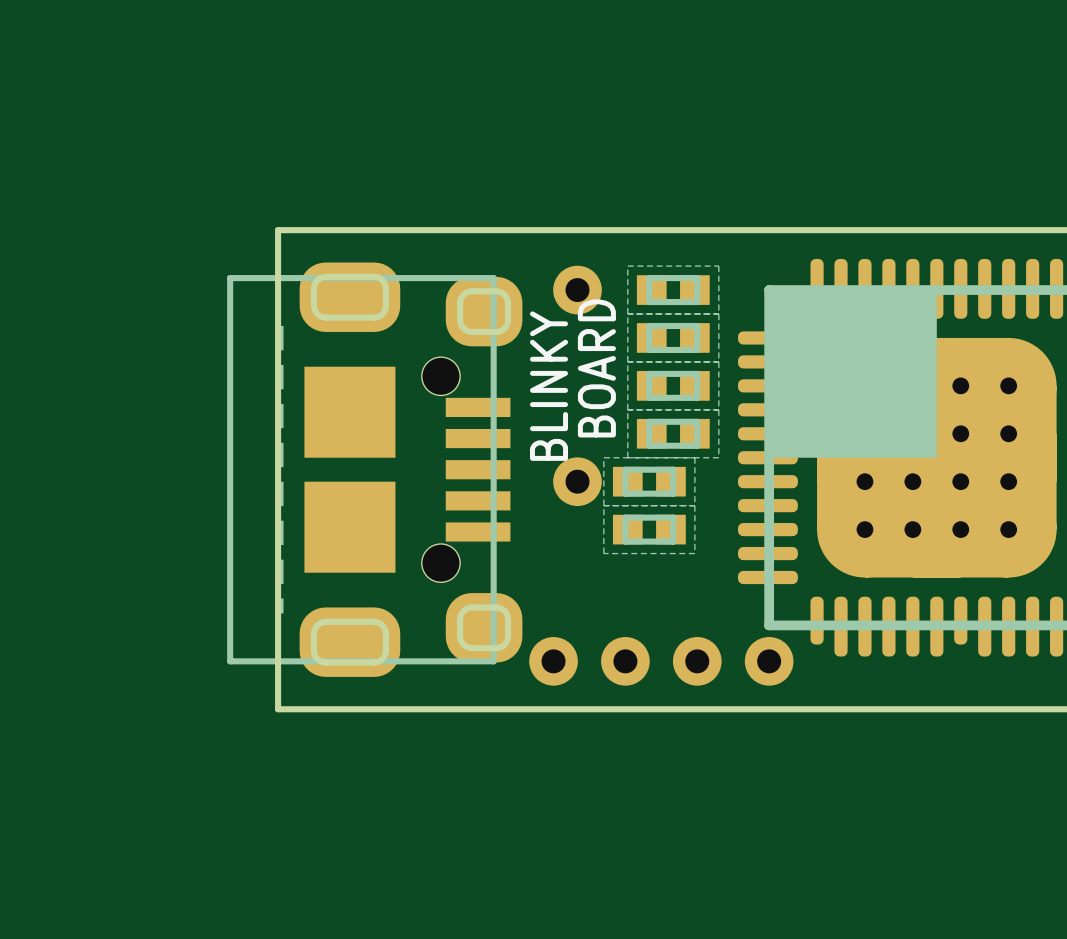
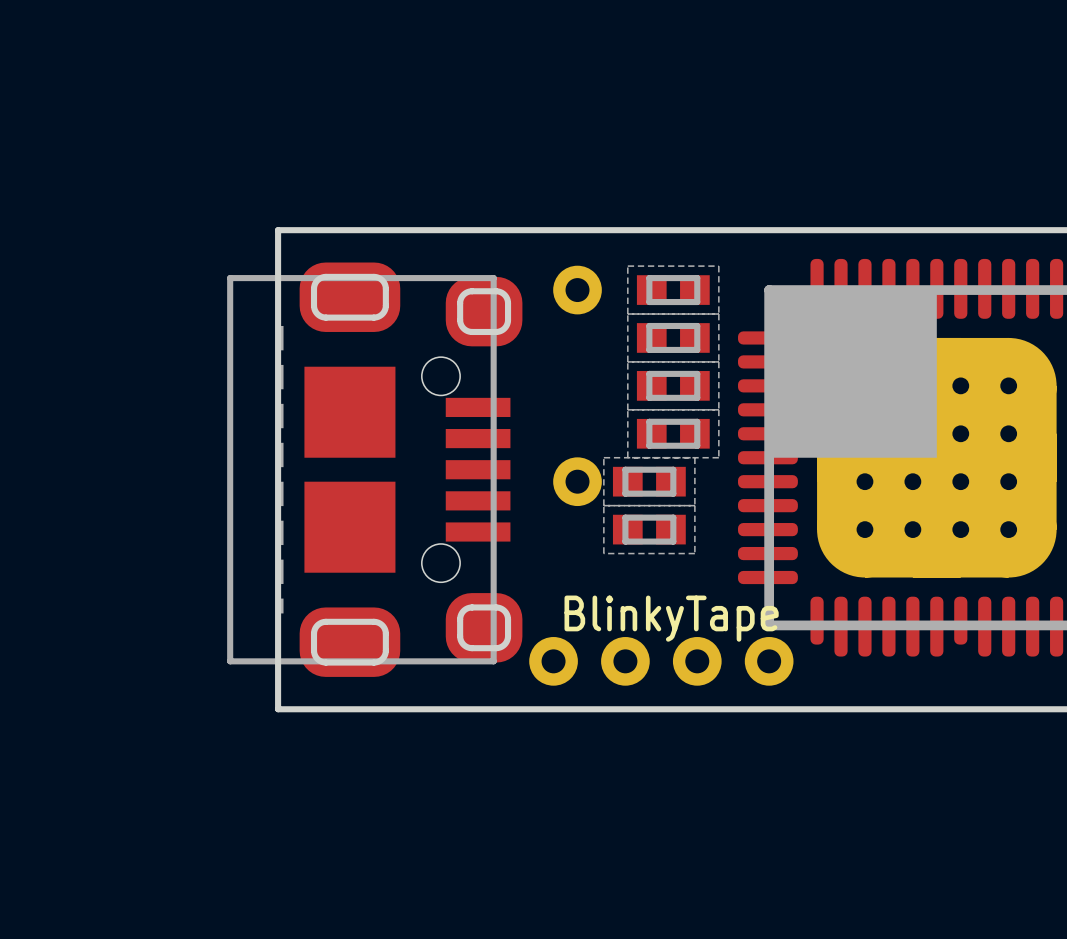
text: BOARD (596, 368) -> none
text: BLINKY (549, 386) -> none
text: none -> BlinkyTape (671, 618)

